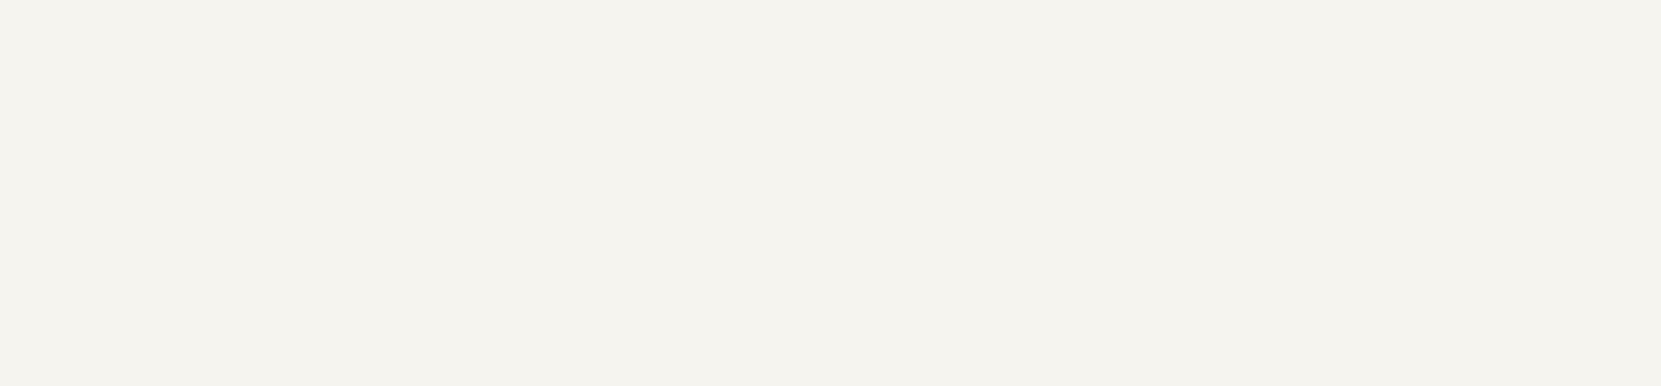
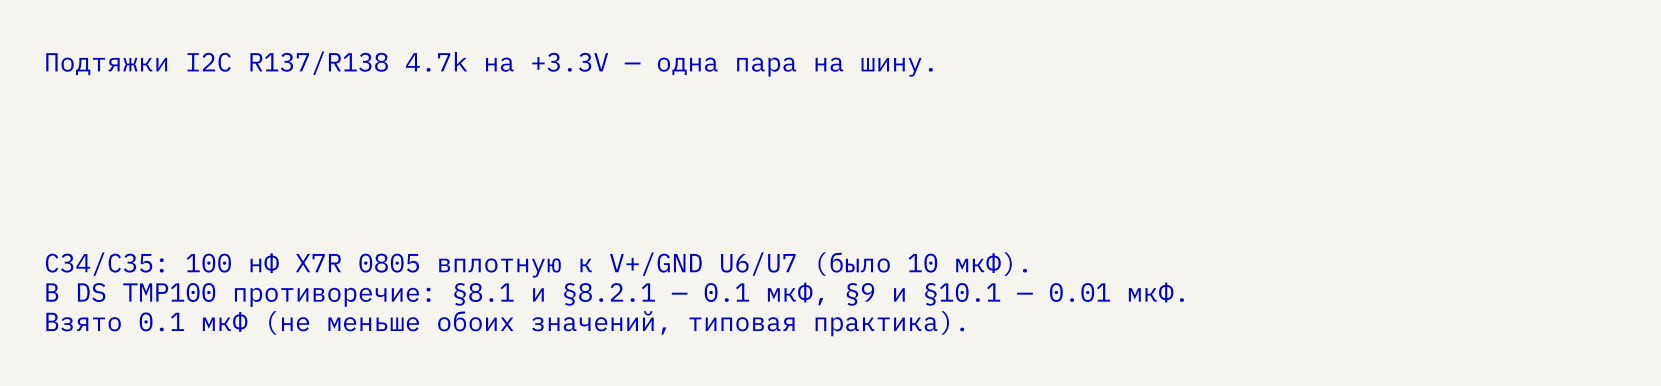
text: none -> Подтяжки I2C R137/R138 4.7k на +3.3V — одна пара на шину. (489, 64)
text: none -> C34/C35: 100 нФ X7R 0805 вплотную к V+/GND U6/U7 (было 10 мкФ). (536, 264)
text: none -> В DS TMP100 противоречие: §8.1 и §8.2.1 — 0.1 мкФ, §9 и §10.1 — 0.01 мкФ. (615, 294)
text: none -> Взято 0.1 мкФ (не меньше обоих значений, типовая практика). (505, 323)

